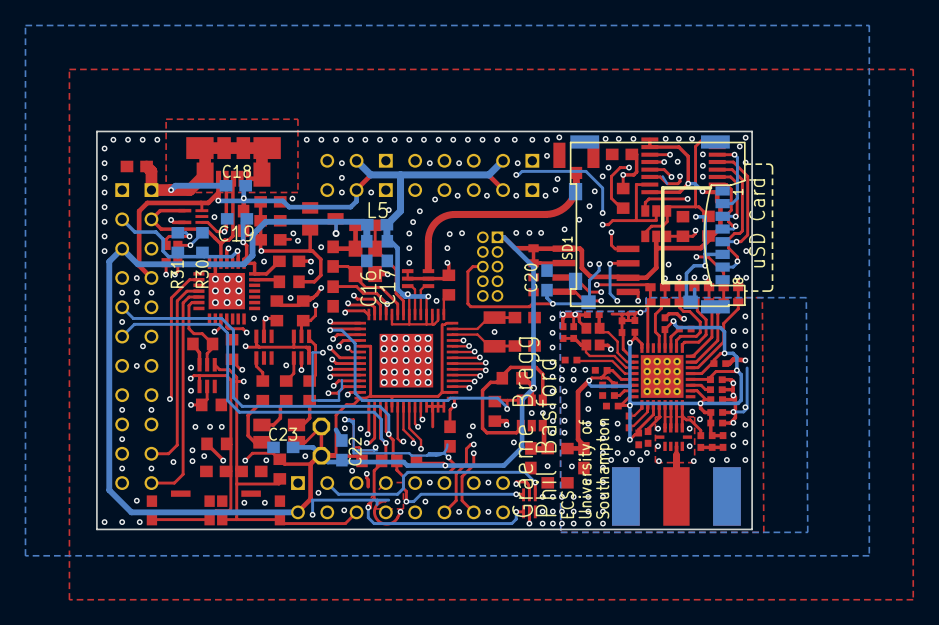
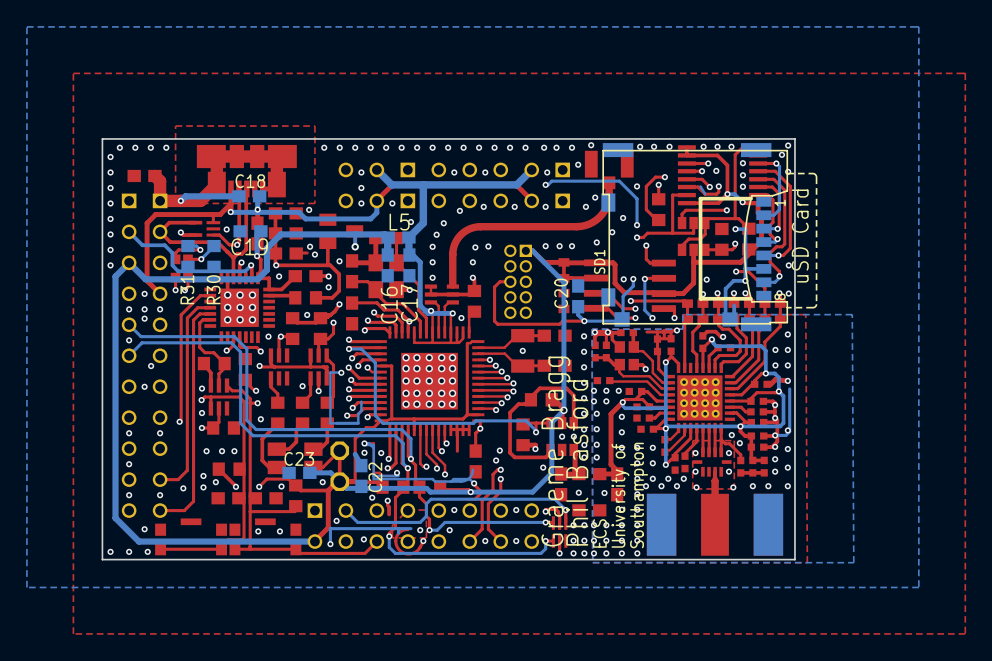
via: none -> (556, 147)
via: (532, 139) -> none
via: none -> (571, 147)
via: (547, 139) -> none
part: (622, 154) -> none
top track: (631, 154) (636, 154) (636, 171) (633, 174) (623, 174) -> none
via: (608, 167) -> none
via: (557, 179) -> none
via: none -> (595, 197)
via: (555, 189) -> none
via: (594, 191) -> none
via: (545, 195) -> none
via: none -> (585, 206)

